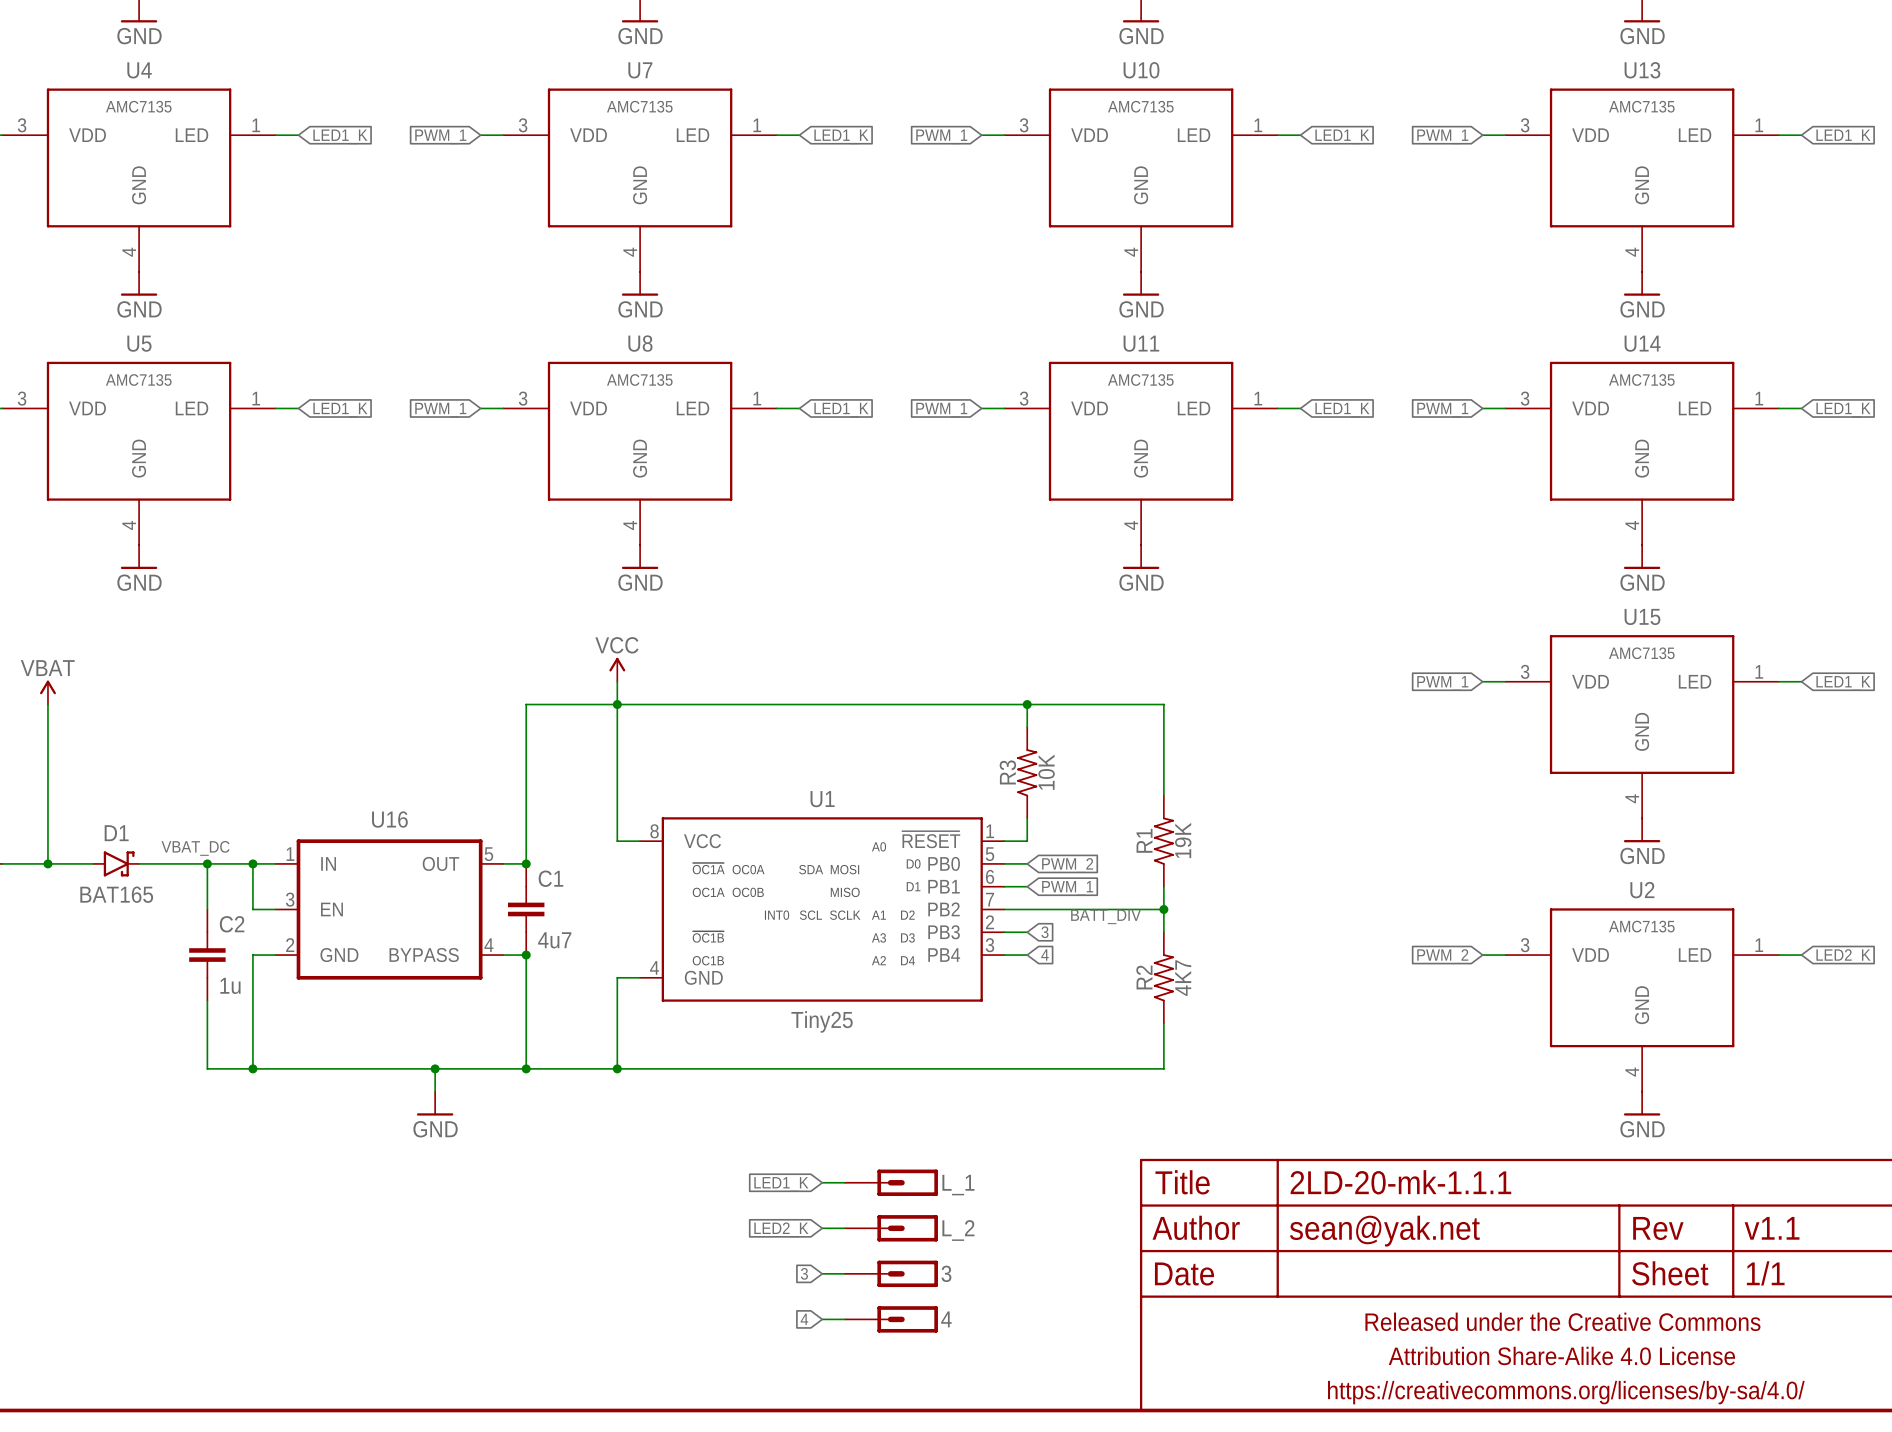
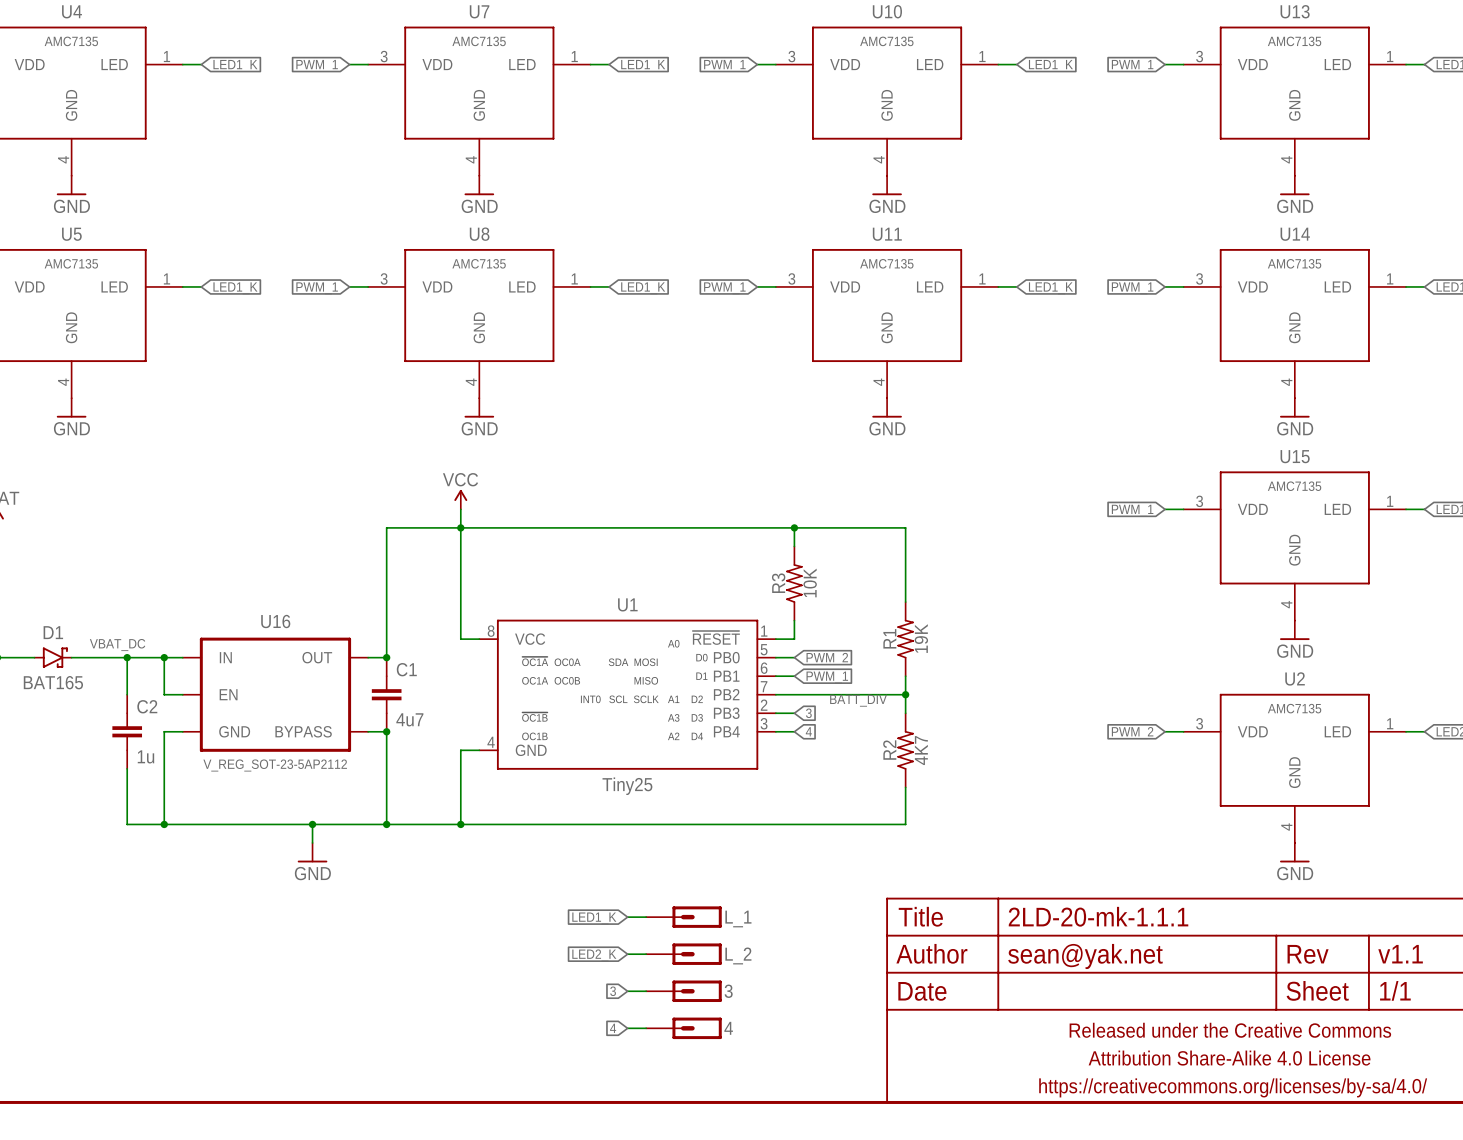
U16 pin number: 1 (290, 854) -> none
U16 pin number: 5 (488, 854) -> none
U16 pin number: 3 (290, 899) -> none
U16 pin number: 2 (290, 945) -> none
U16 pin number: 4 (488, 945) -> none
U16 value: none -> V_REG_SOT-23-5AP2112 (275, 765)

